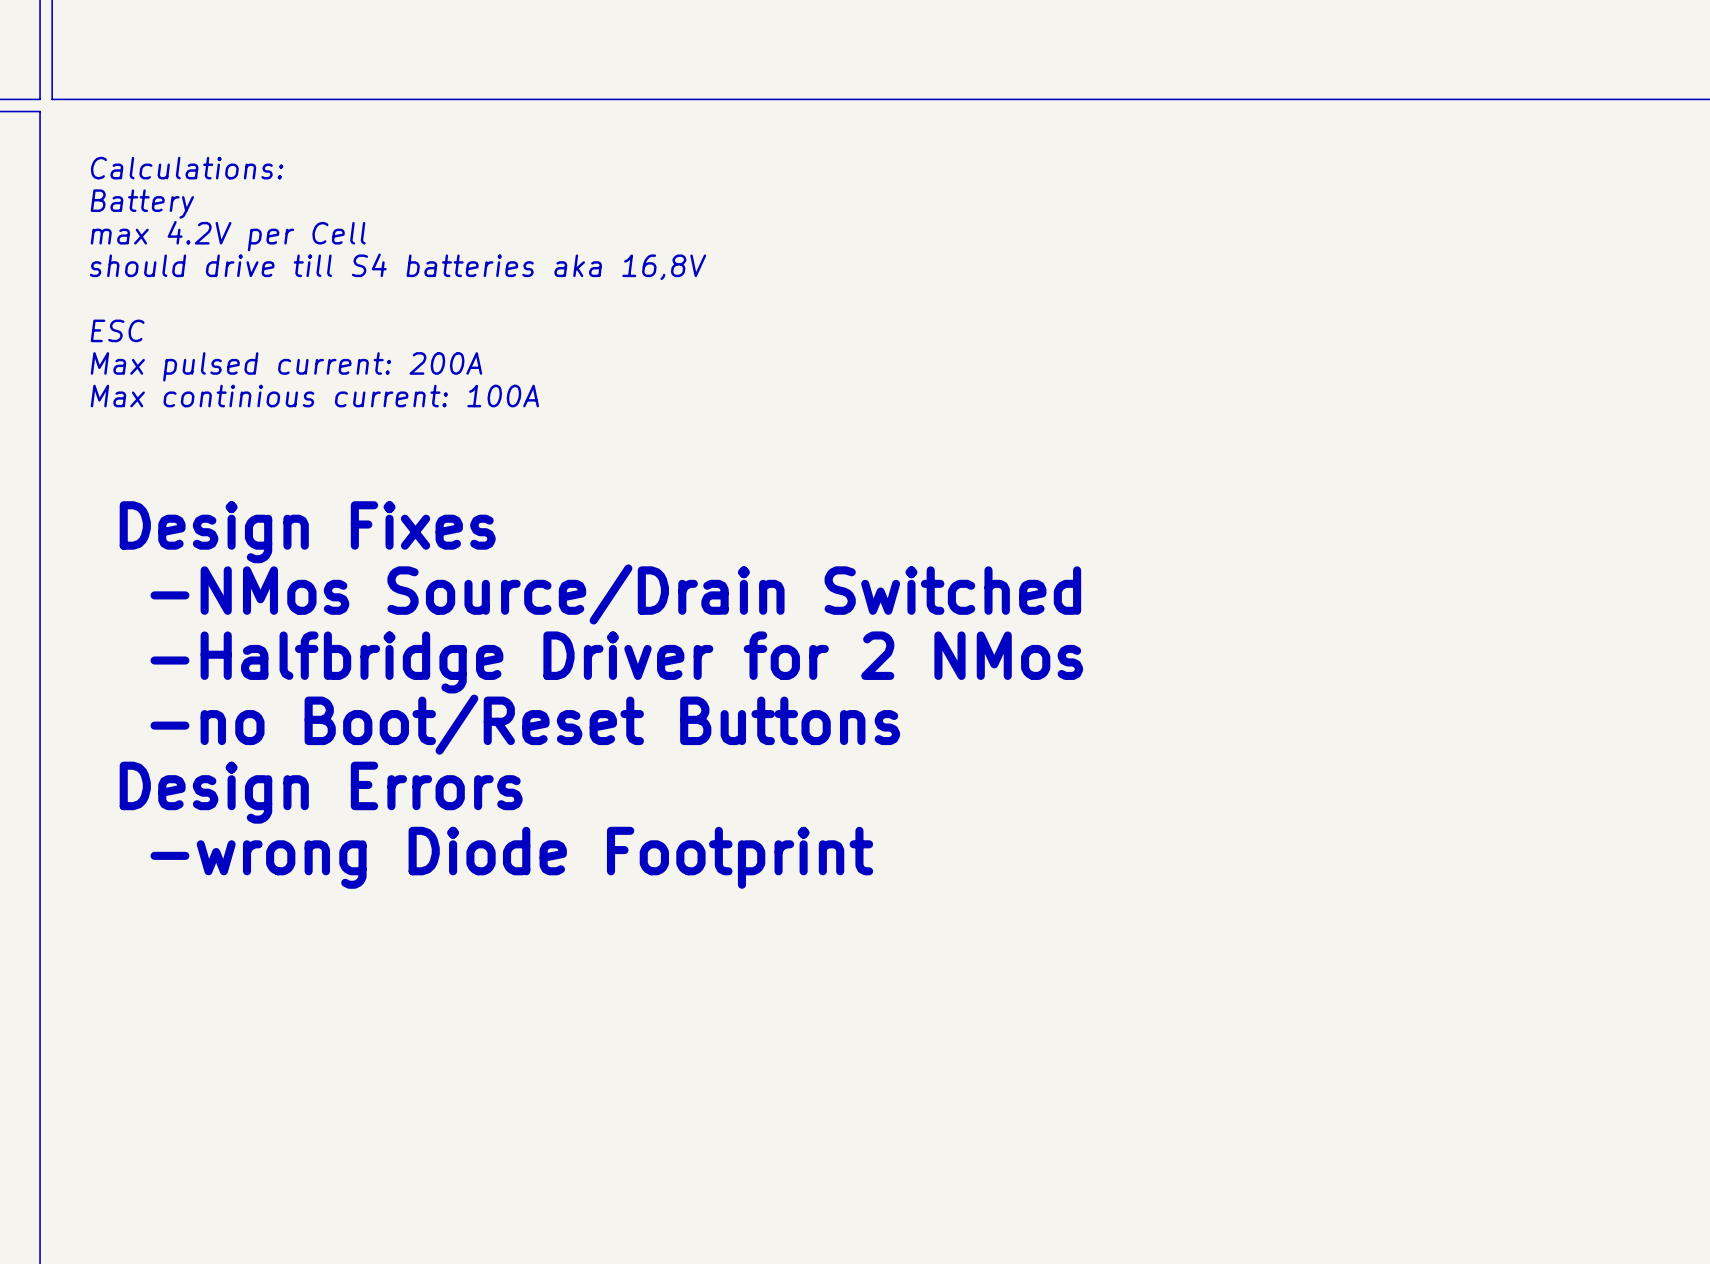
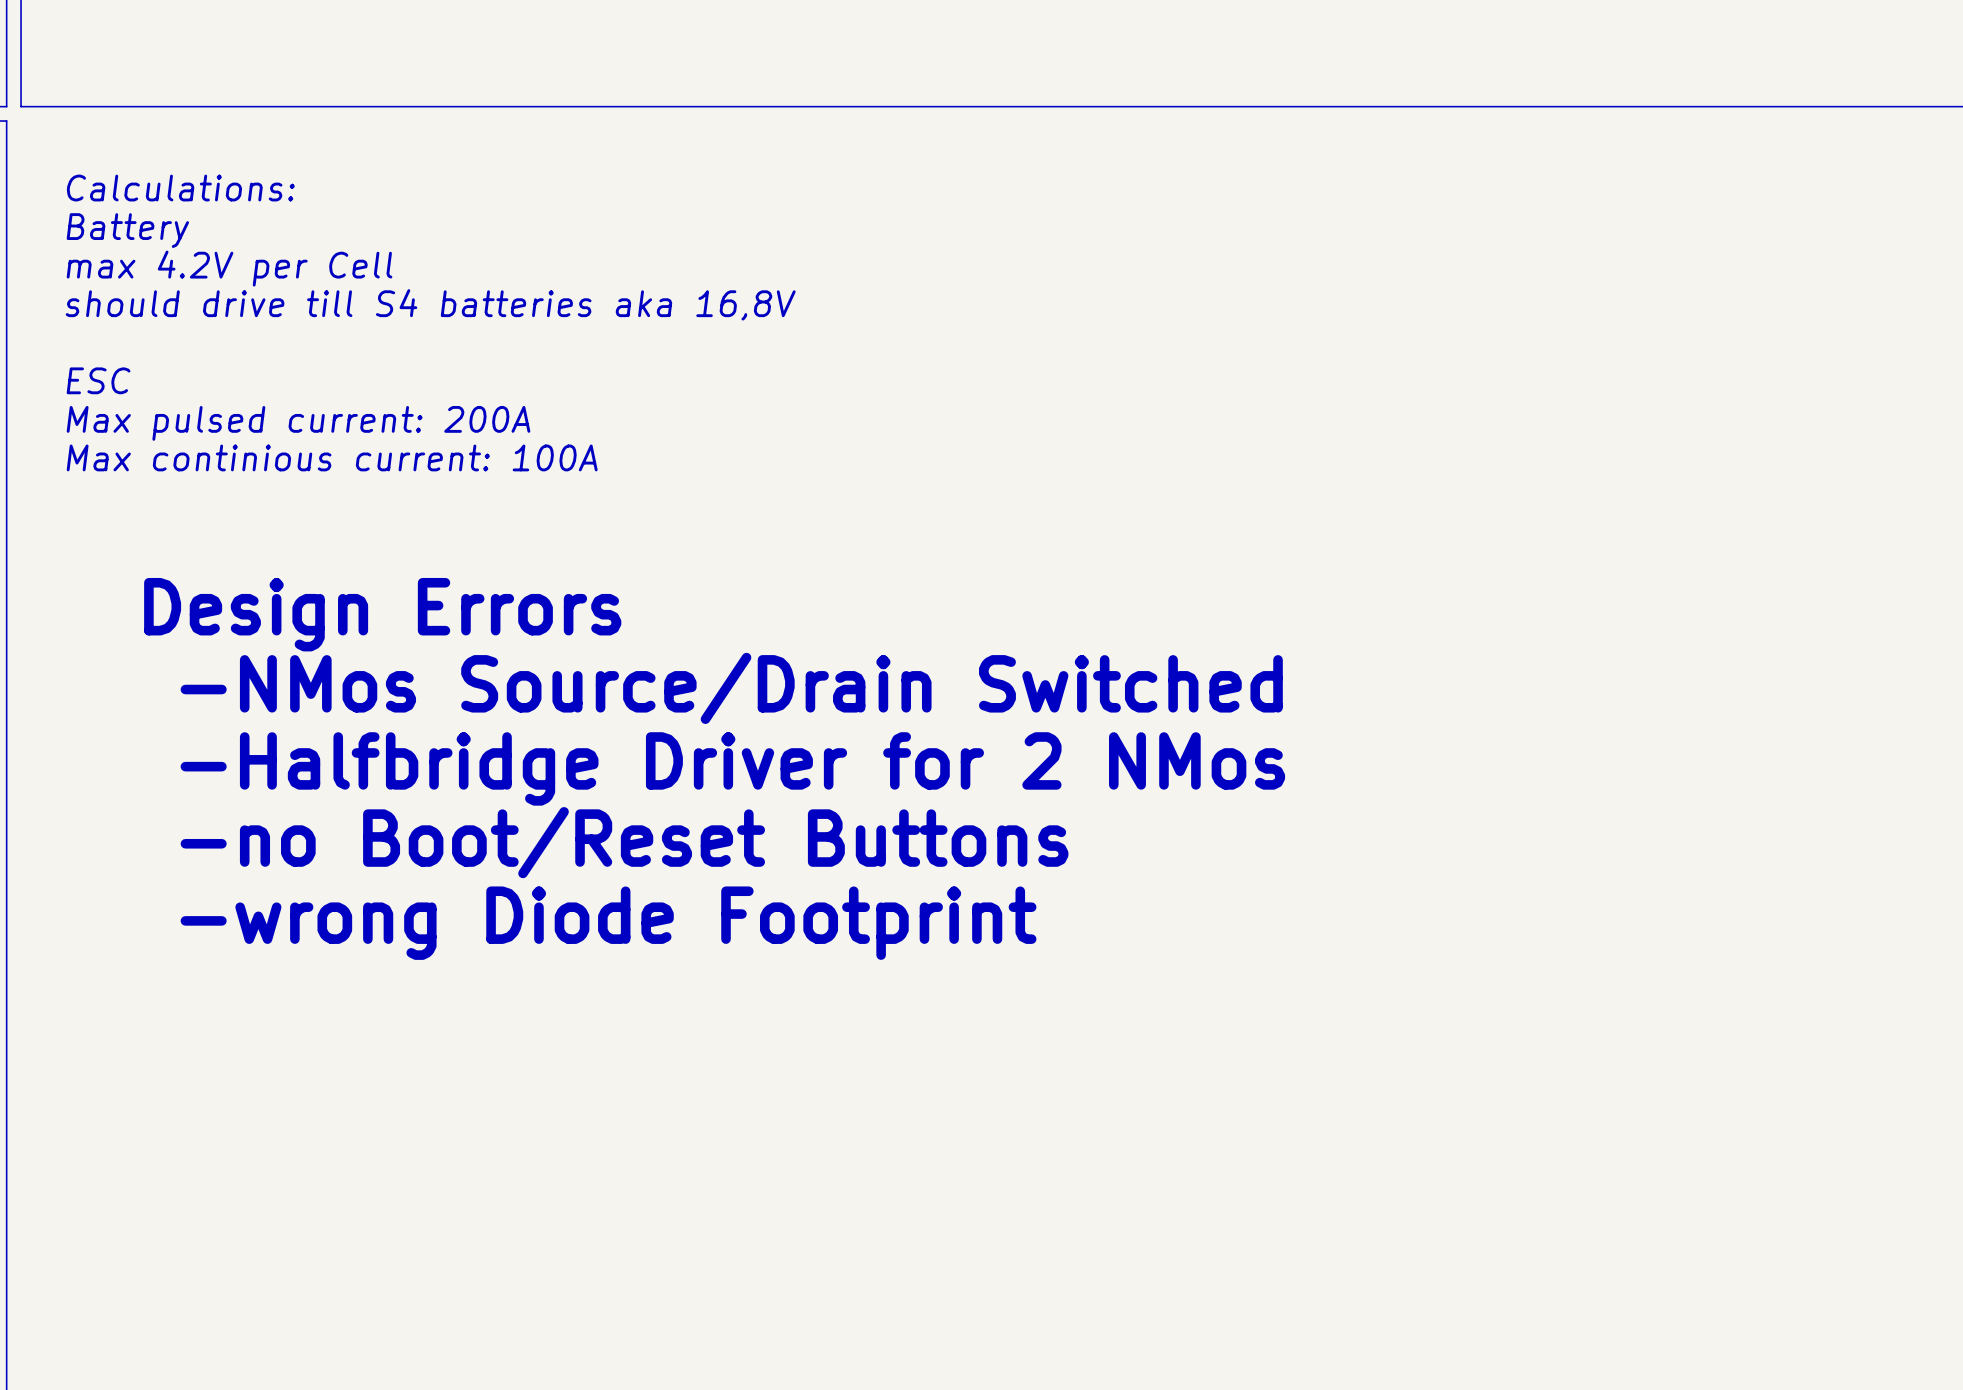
text: Design Fixes (307, 532) -> none
text position: -NMos Source/Drain Switched (615, 594) -> -NMos Source/Drain Switched (731, 688)
text position: -Halfbridge Driver for 2 NMos (616, 662) -> -Halfbridge Driver for 2 NMos (732, 768)
text position: -no Boot/Reset Buttons (525, 724) -> -no Boot/Reset Buttons (624, 842)
text position: Design Errors (321, 792) -> Design Errors (382, 614)
text position: -wrong Diode Footprint (511, 857) -> -wrong Diode Footprint (608, 923)

